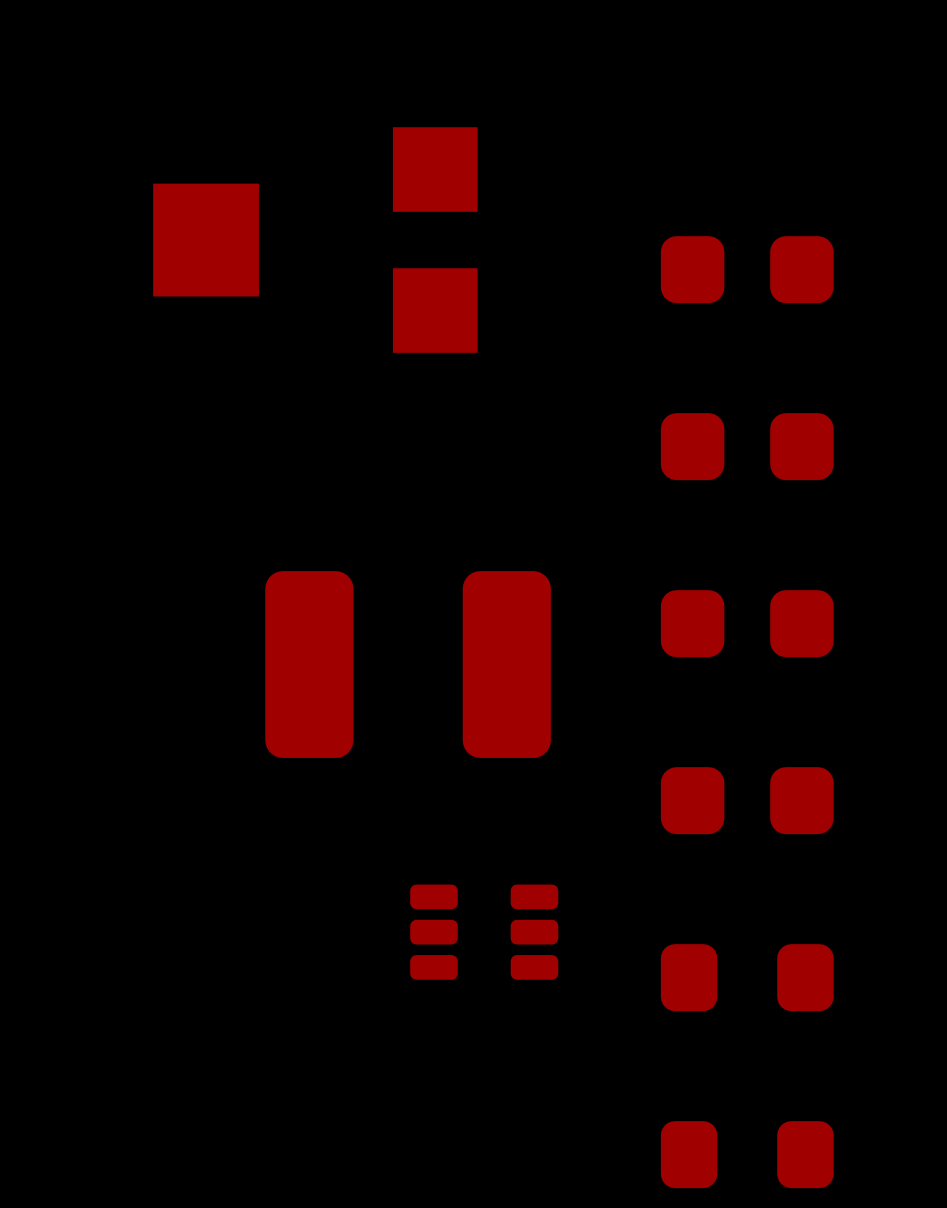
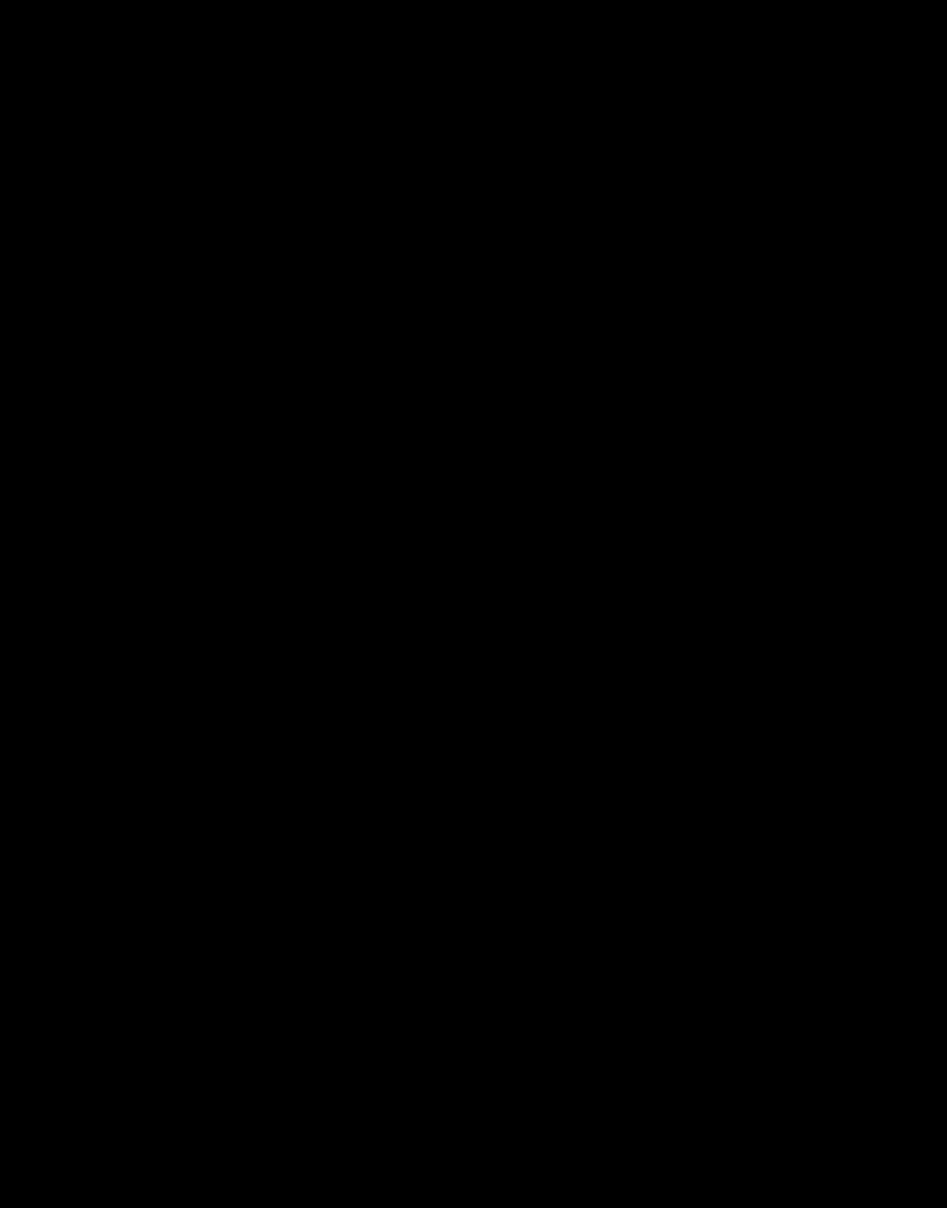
part: (315, 240) -> none
part: (747, 269) -> none
part: (747, 446) -> none
part: (747, 623) -> none
part: (408, 664) -> none
part: (747, 800) -> none
part: (484, 932) -> none
part: (747, 977) -> none
part: (747, 1154) -> none

